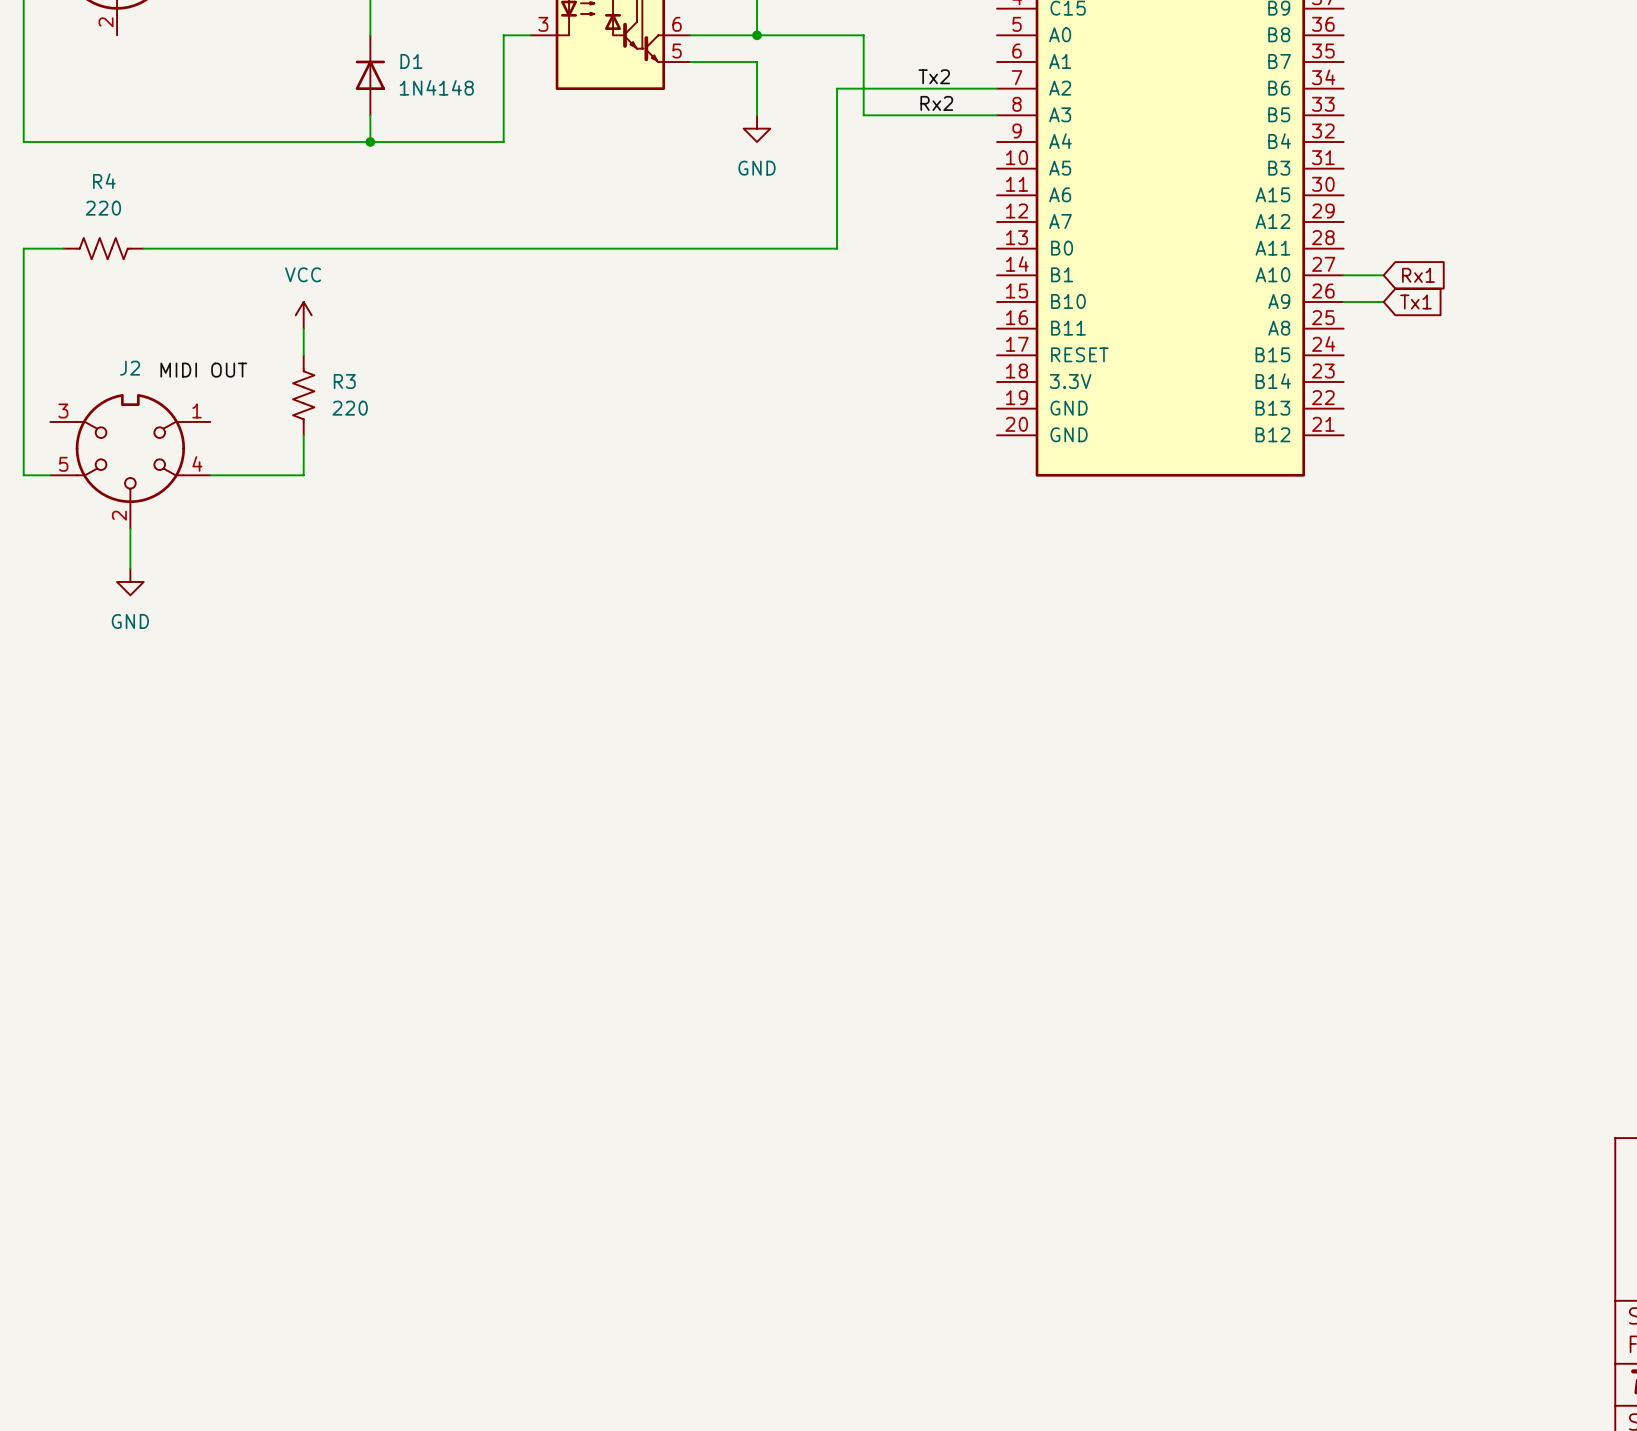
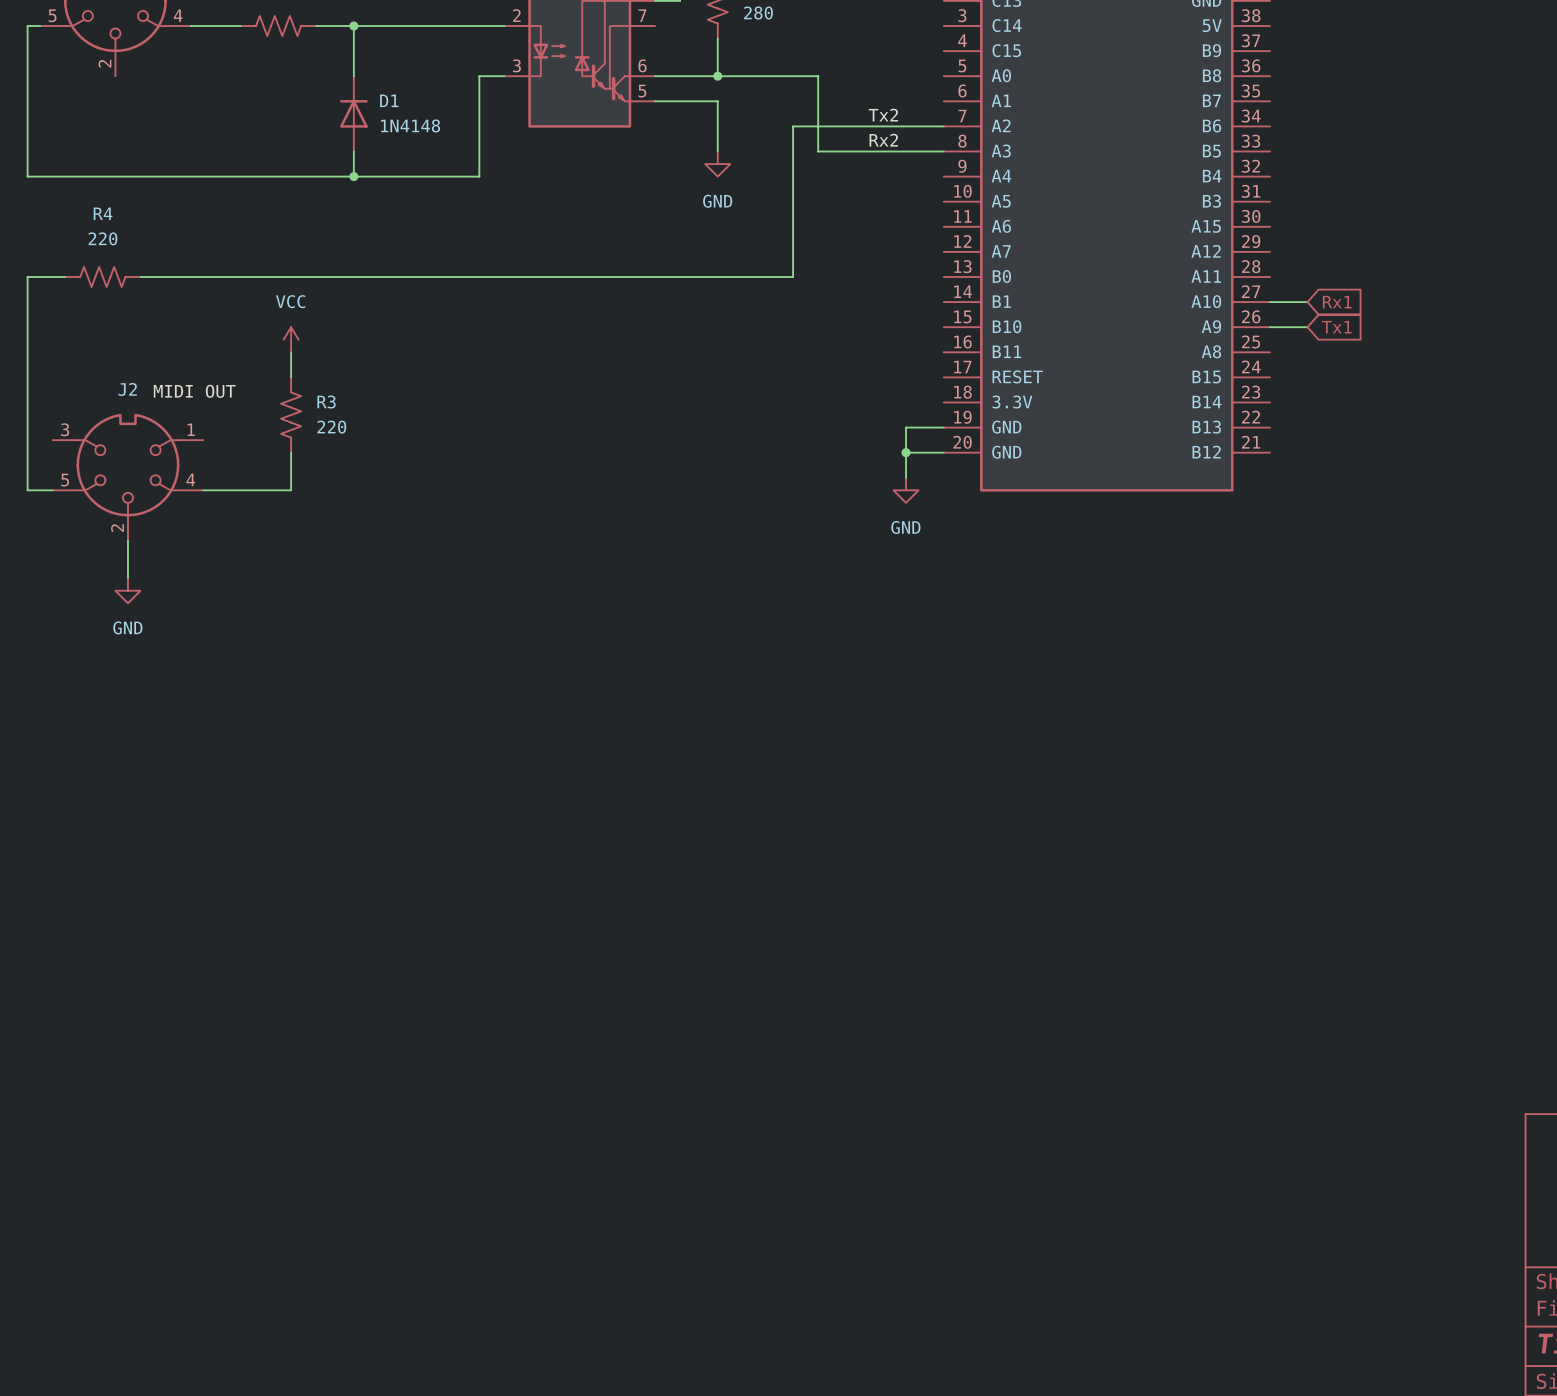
wire: none -> (943, 427) (906, 427) (906, 477)
wire: none -> (906, 452) (943, 452)
junction: none -> (906, 452)
power symbol: none -> GND (906, 490)

